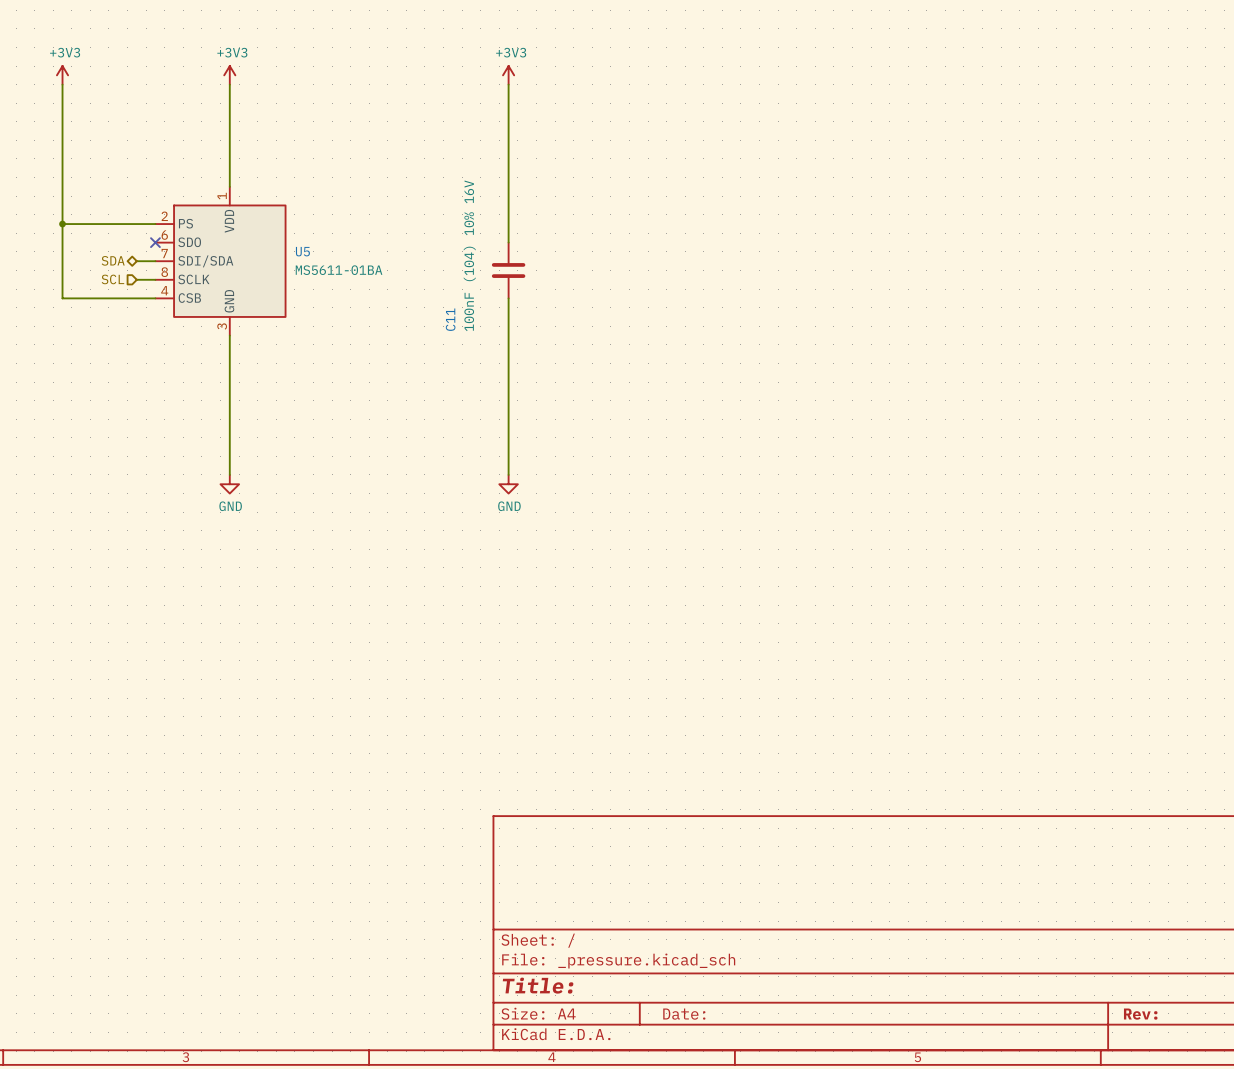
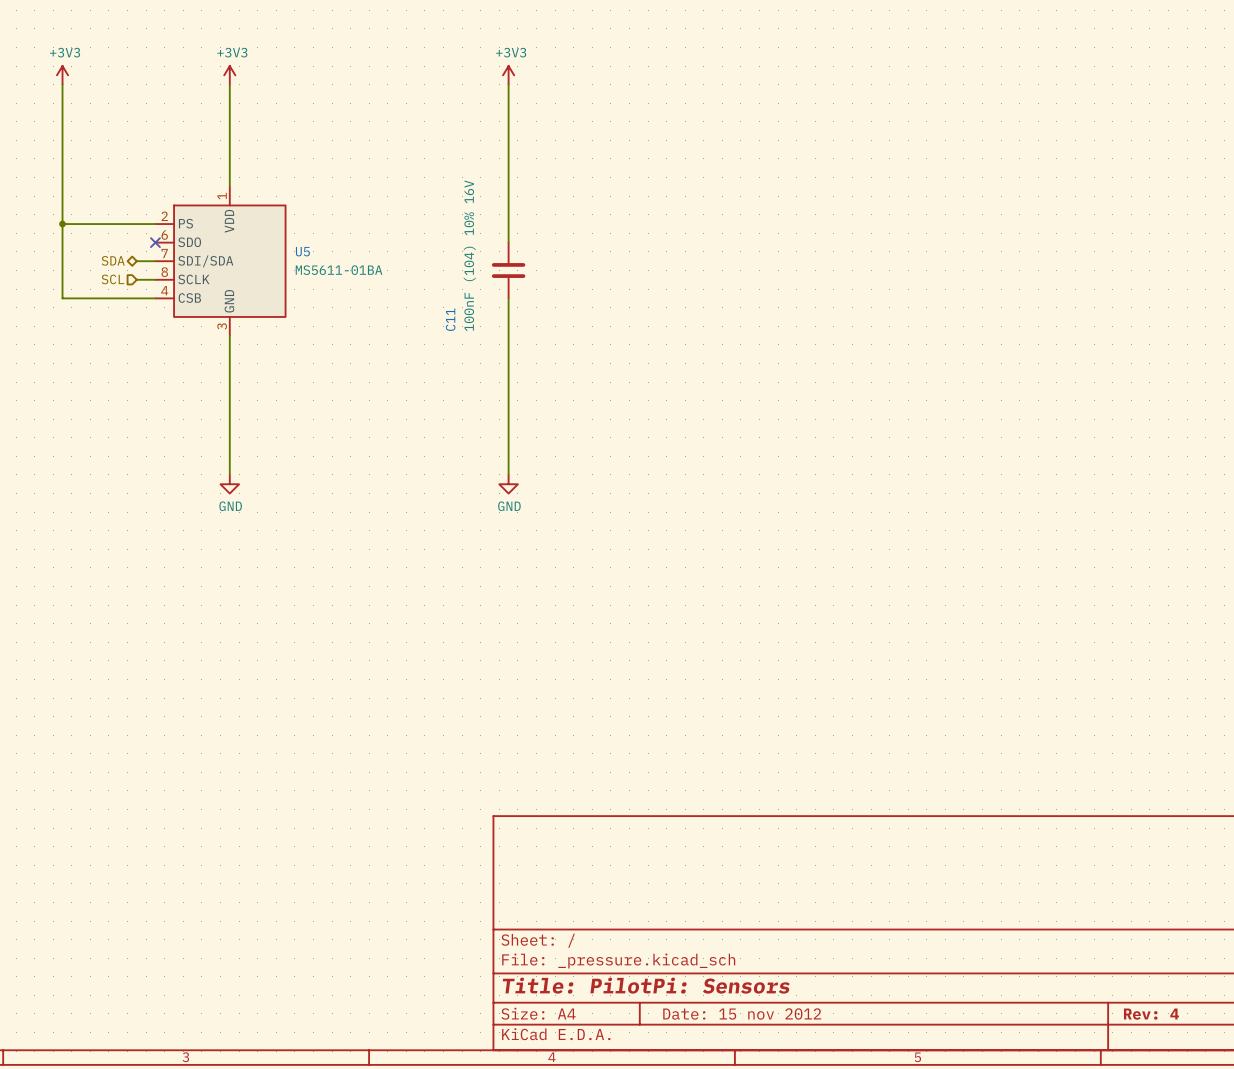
title block: Title: (538, 985) -> Title: PilotPi: Sensors (646, 985)
title block: Date: (684, 1014) -> Date: 15 nov 2012 (742, 1014)
title block: Rev: (1140, 1014) -> Rev: 4 (1151, 1014)

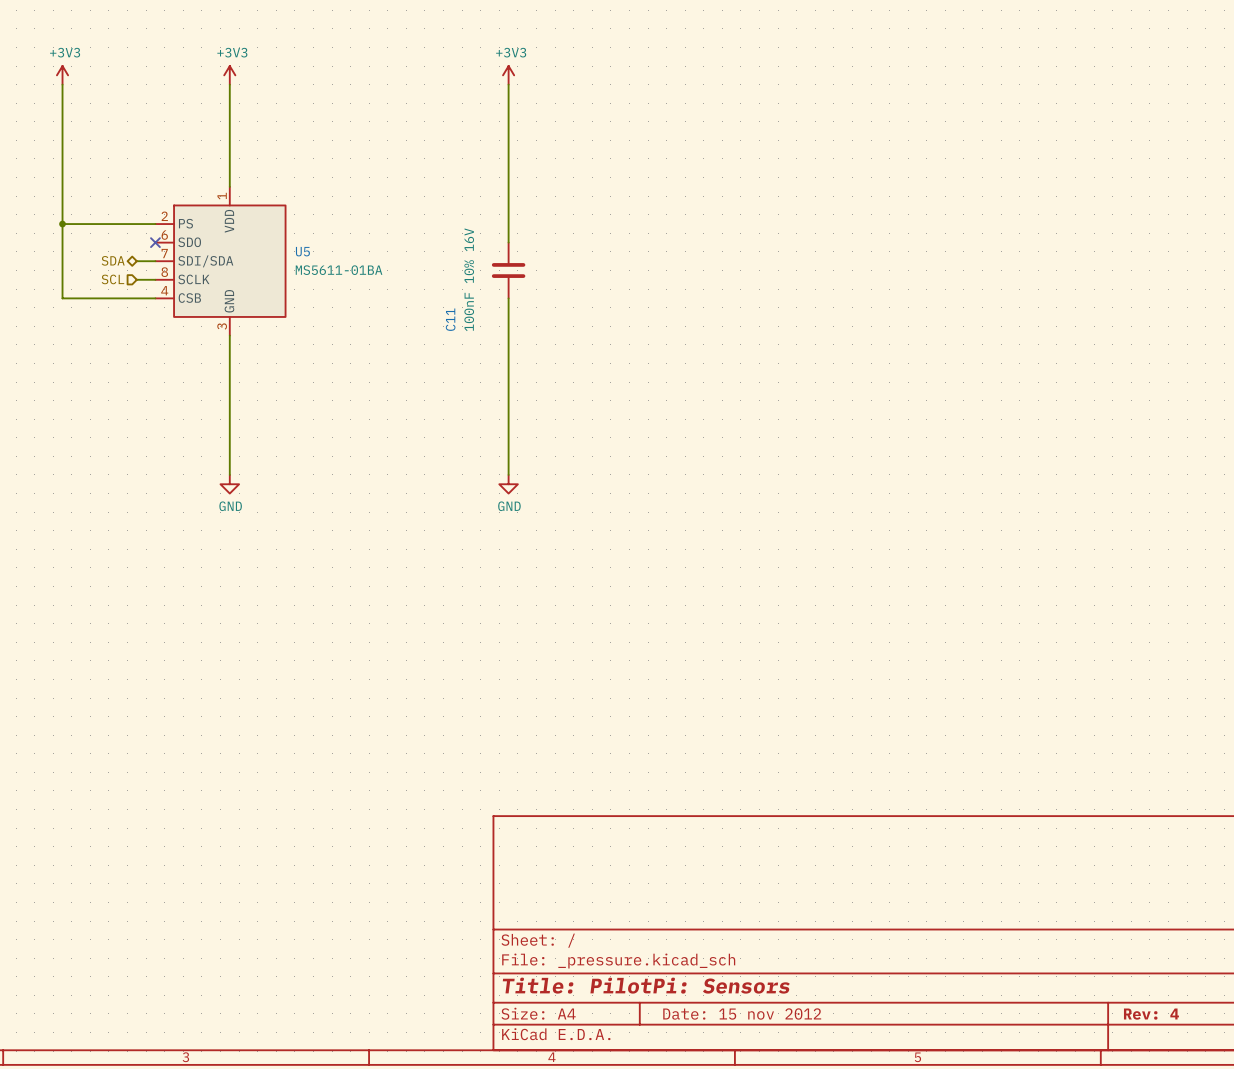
C11 value: 100nF (104) 10% 16V (469, 255) -> 100nF 10% 16V (469, 279)

